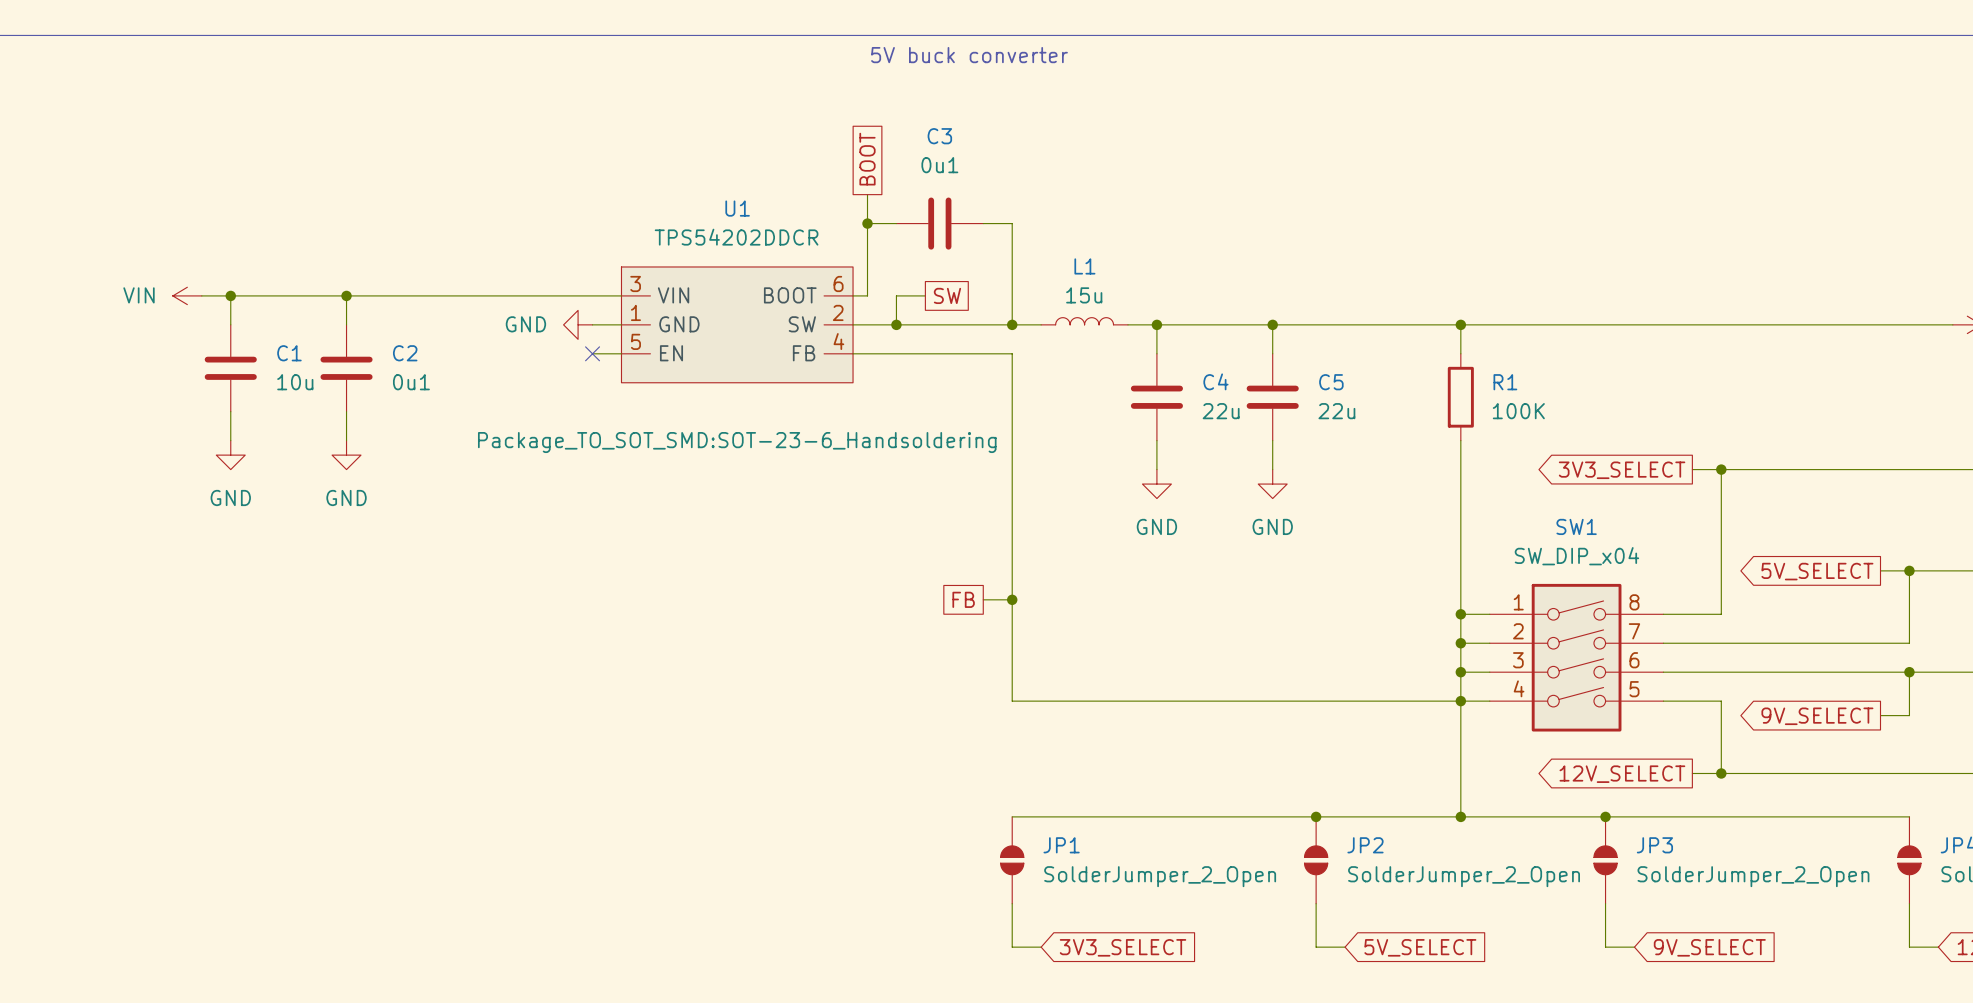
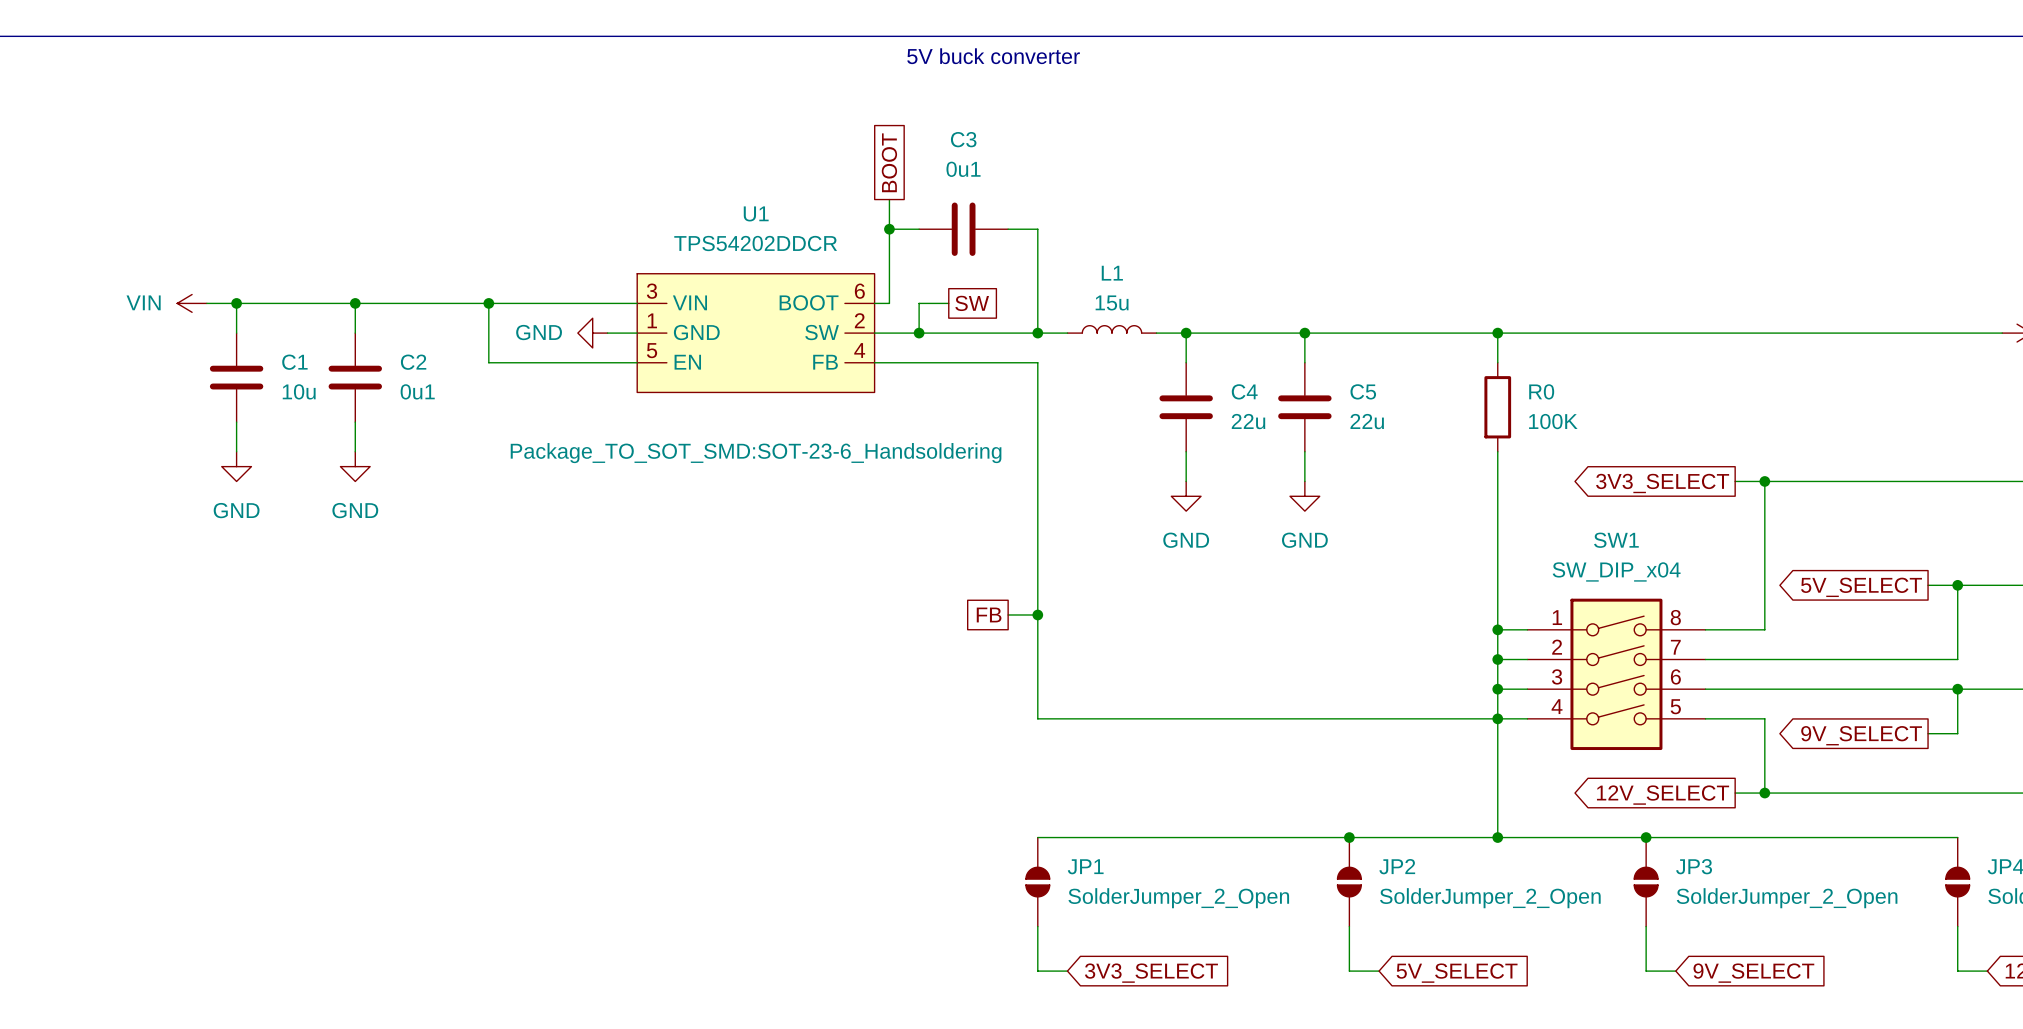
wire: none -> (488, 303) (488, 362) (607, 362)
junction: none -> (488, 303)
no-connect mark: (592, 353) -> none
R1 name: R1 (1505, 382) -> R0 (1541, 391)

